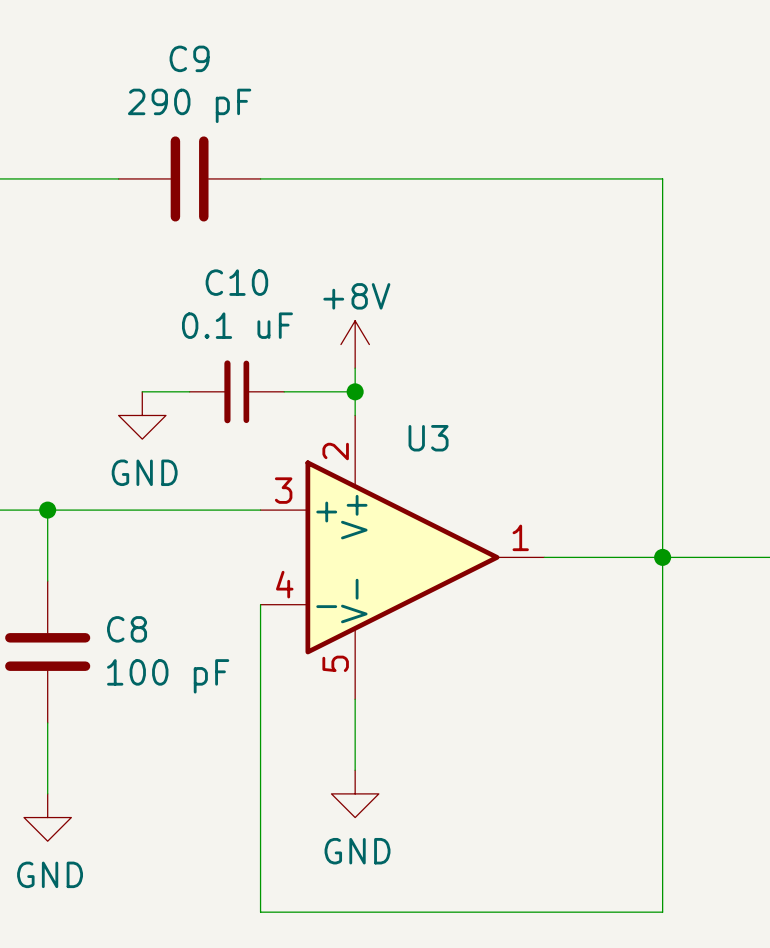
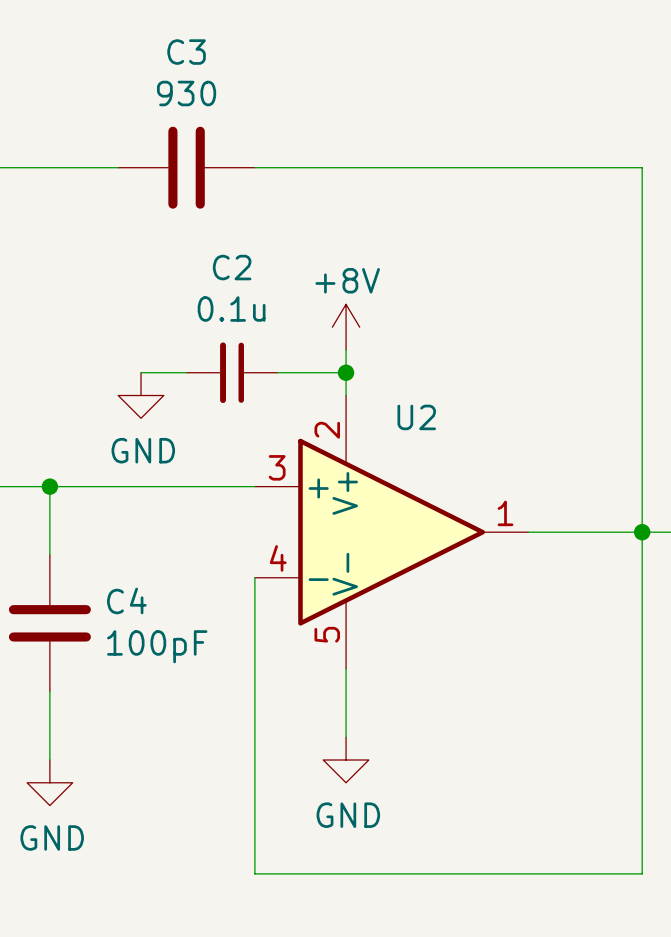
C9 name: C9 (189, 58) -> C3 (186, 52)
C9 value: 290 pF (189, 105) -> 930 (186, 93)
C10 name: C10 (236, 282) -> C2 (232, 267)
C10 value: 0.1 uF (237, 325) -> 0.1u (231, 309)
U3 name: U3 (428, 438) -> U2 (416, 417)
C8 name: C8 (127, 629) -> C4 (126, 600)
C8 value: 100 pF (168, 676) -> 100pF (157, 646)

